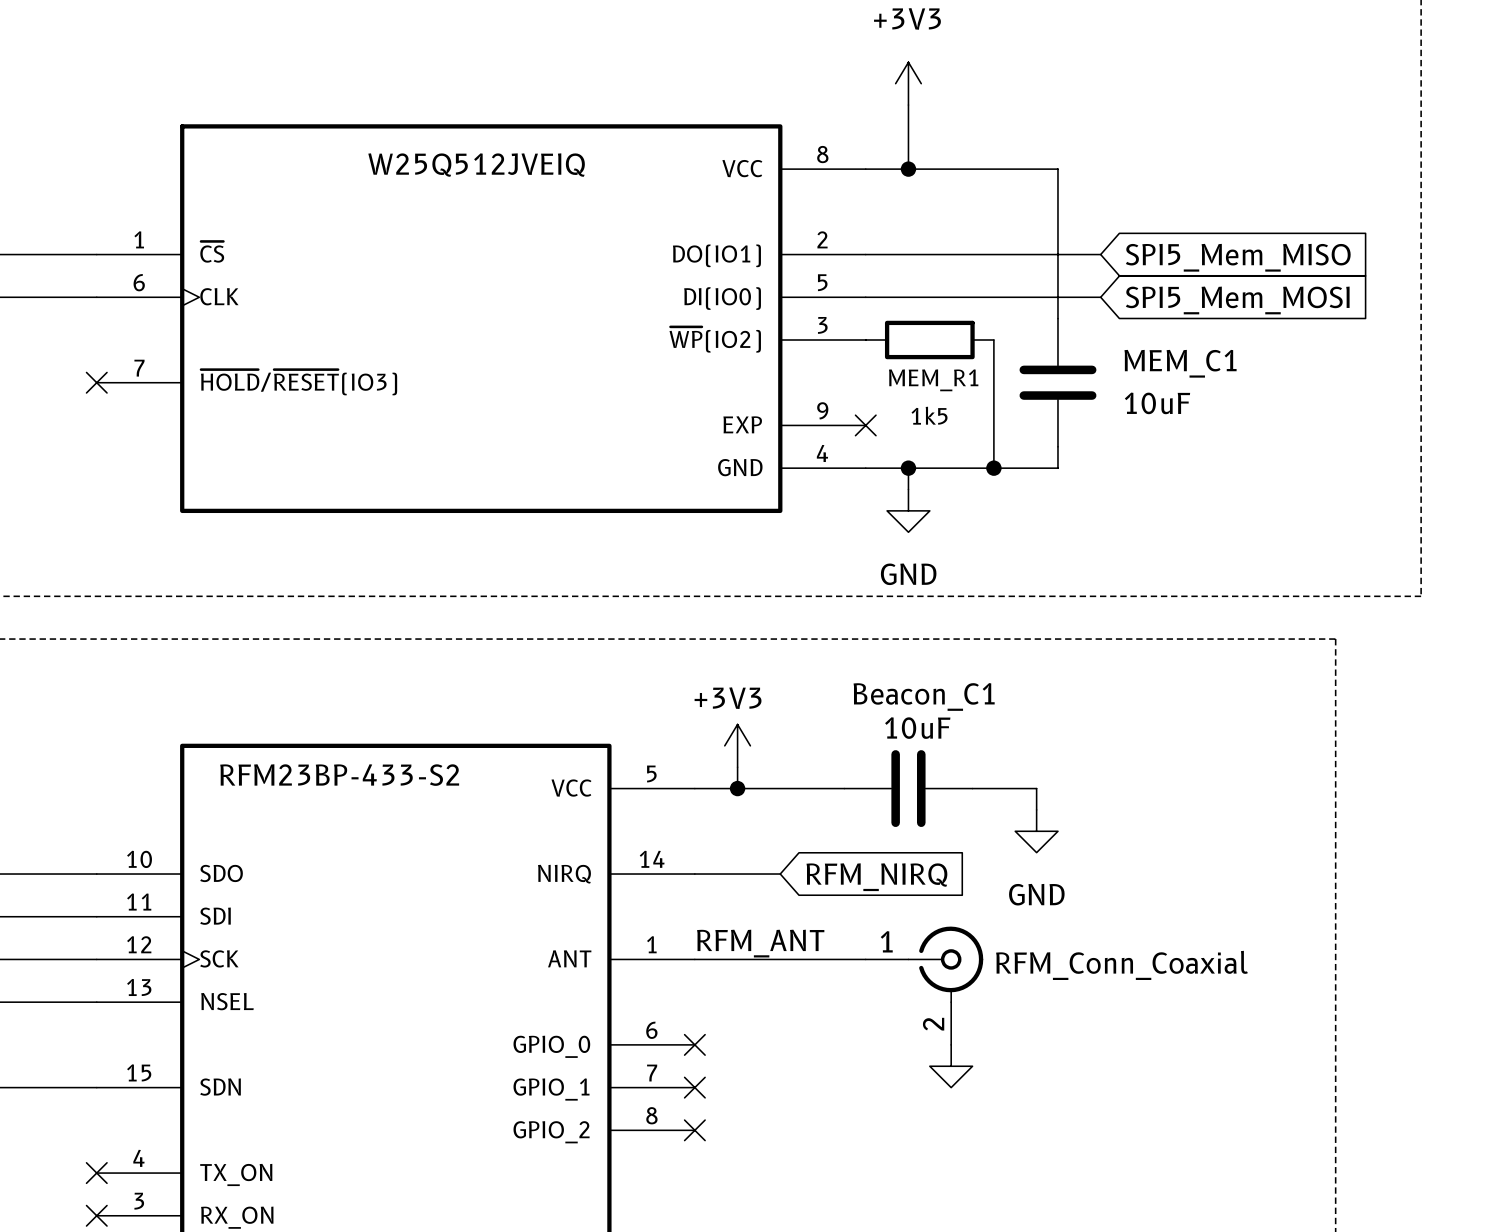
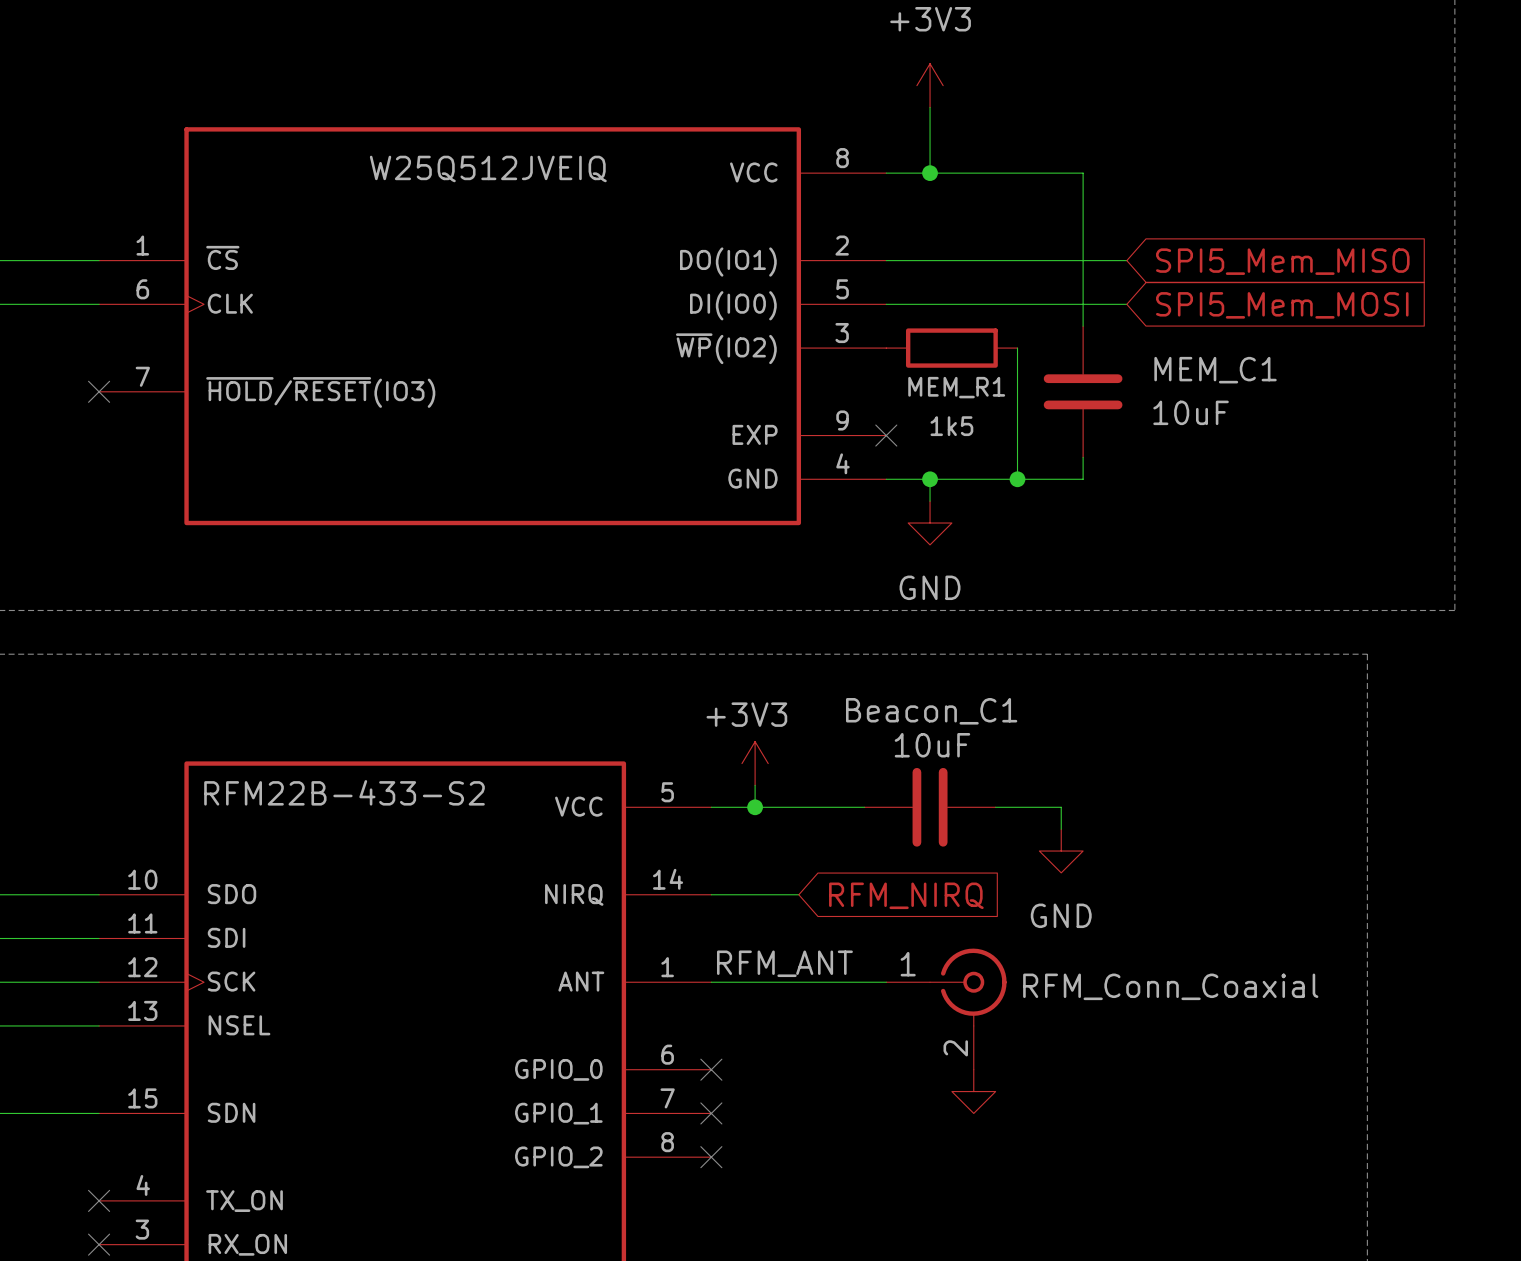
part value: RFM23BP-433-S2 (339, 775) -> RFM22B-433-S2 (344, 792)

